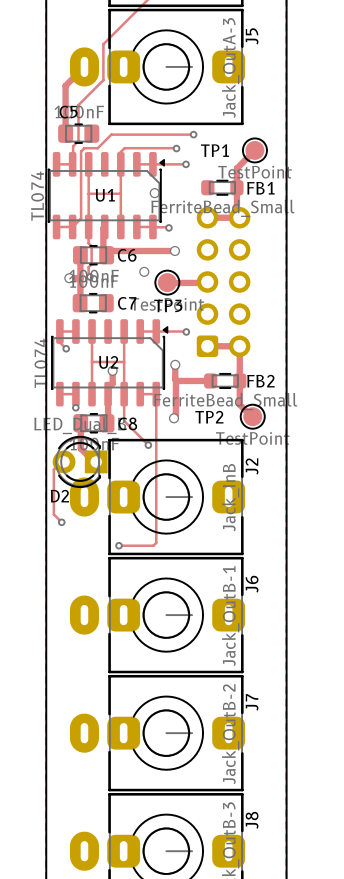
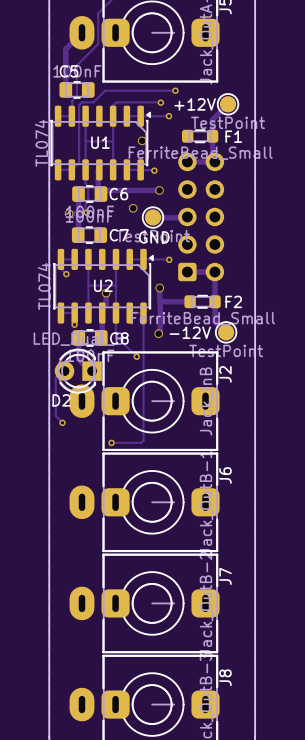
TP1 name: TP1 (215, 150) -> +12V (195, 104)
FB1 name: FB1 (260, 188) -> F1 (233, 136)
TP3 name: TP3 (168, 305) -> GND (154, 237)
FB2 name: FB2 (260, 381) -> F2 (233, 301)
TP2 name: TP2 (209, 417) -> -12V (190, 332)

